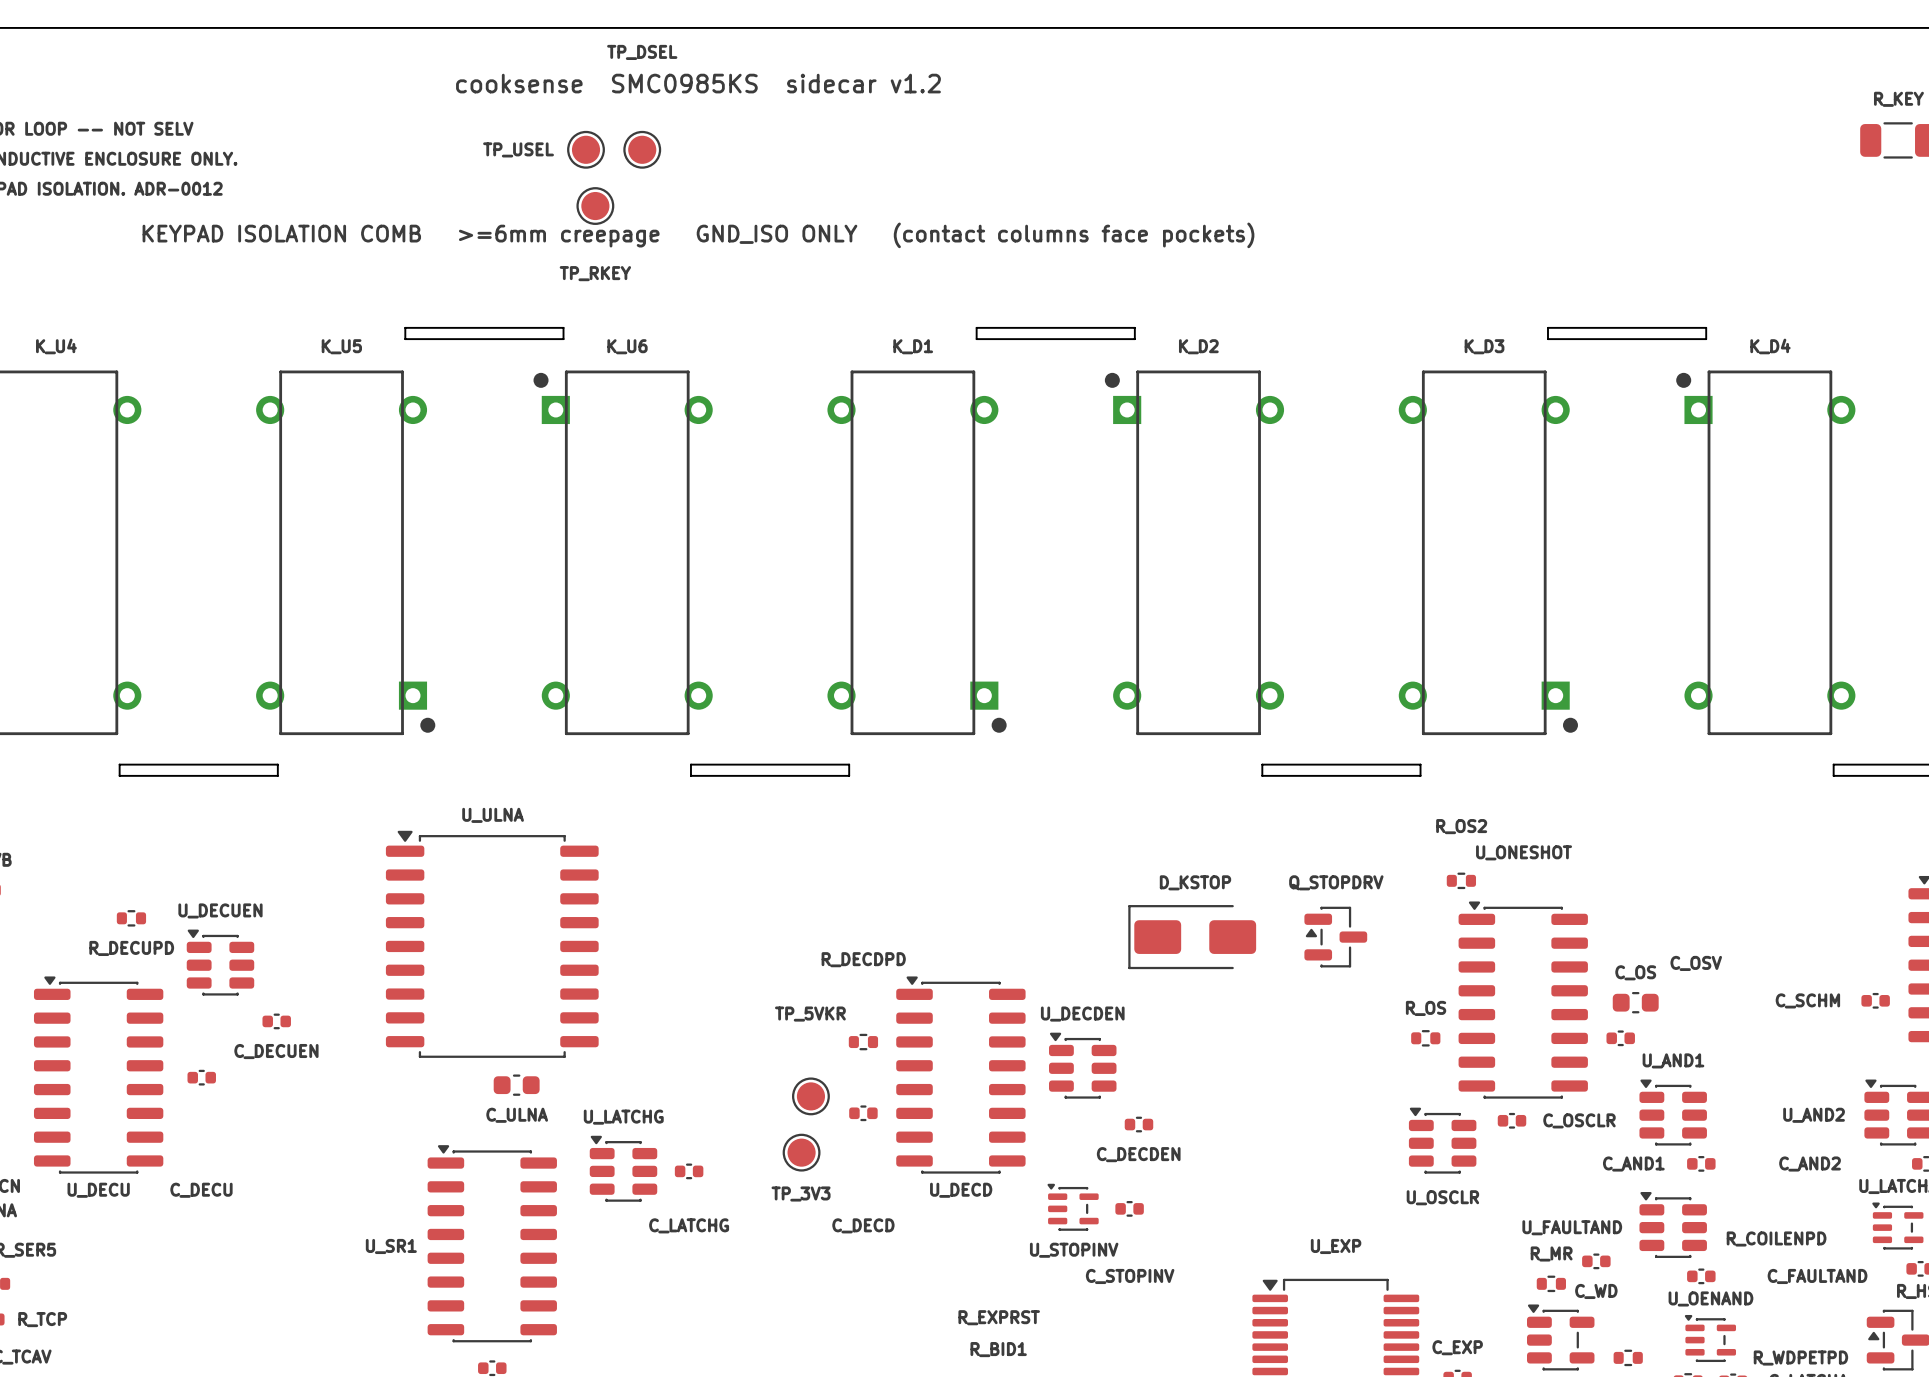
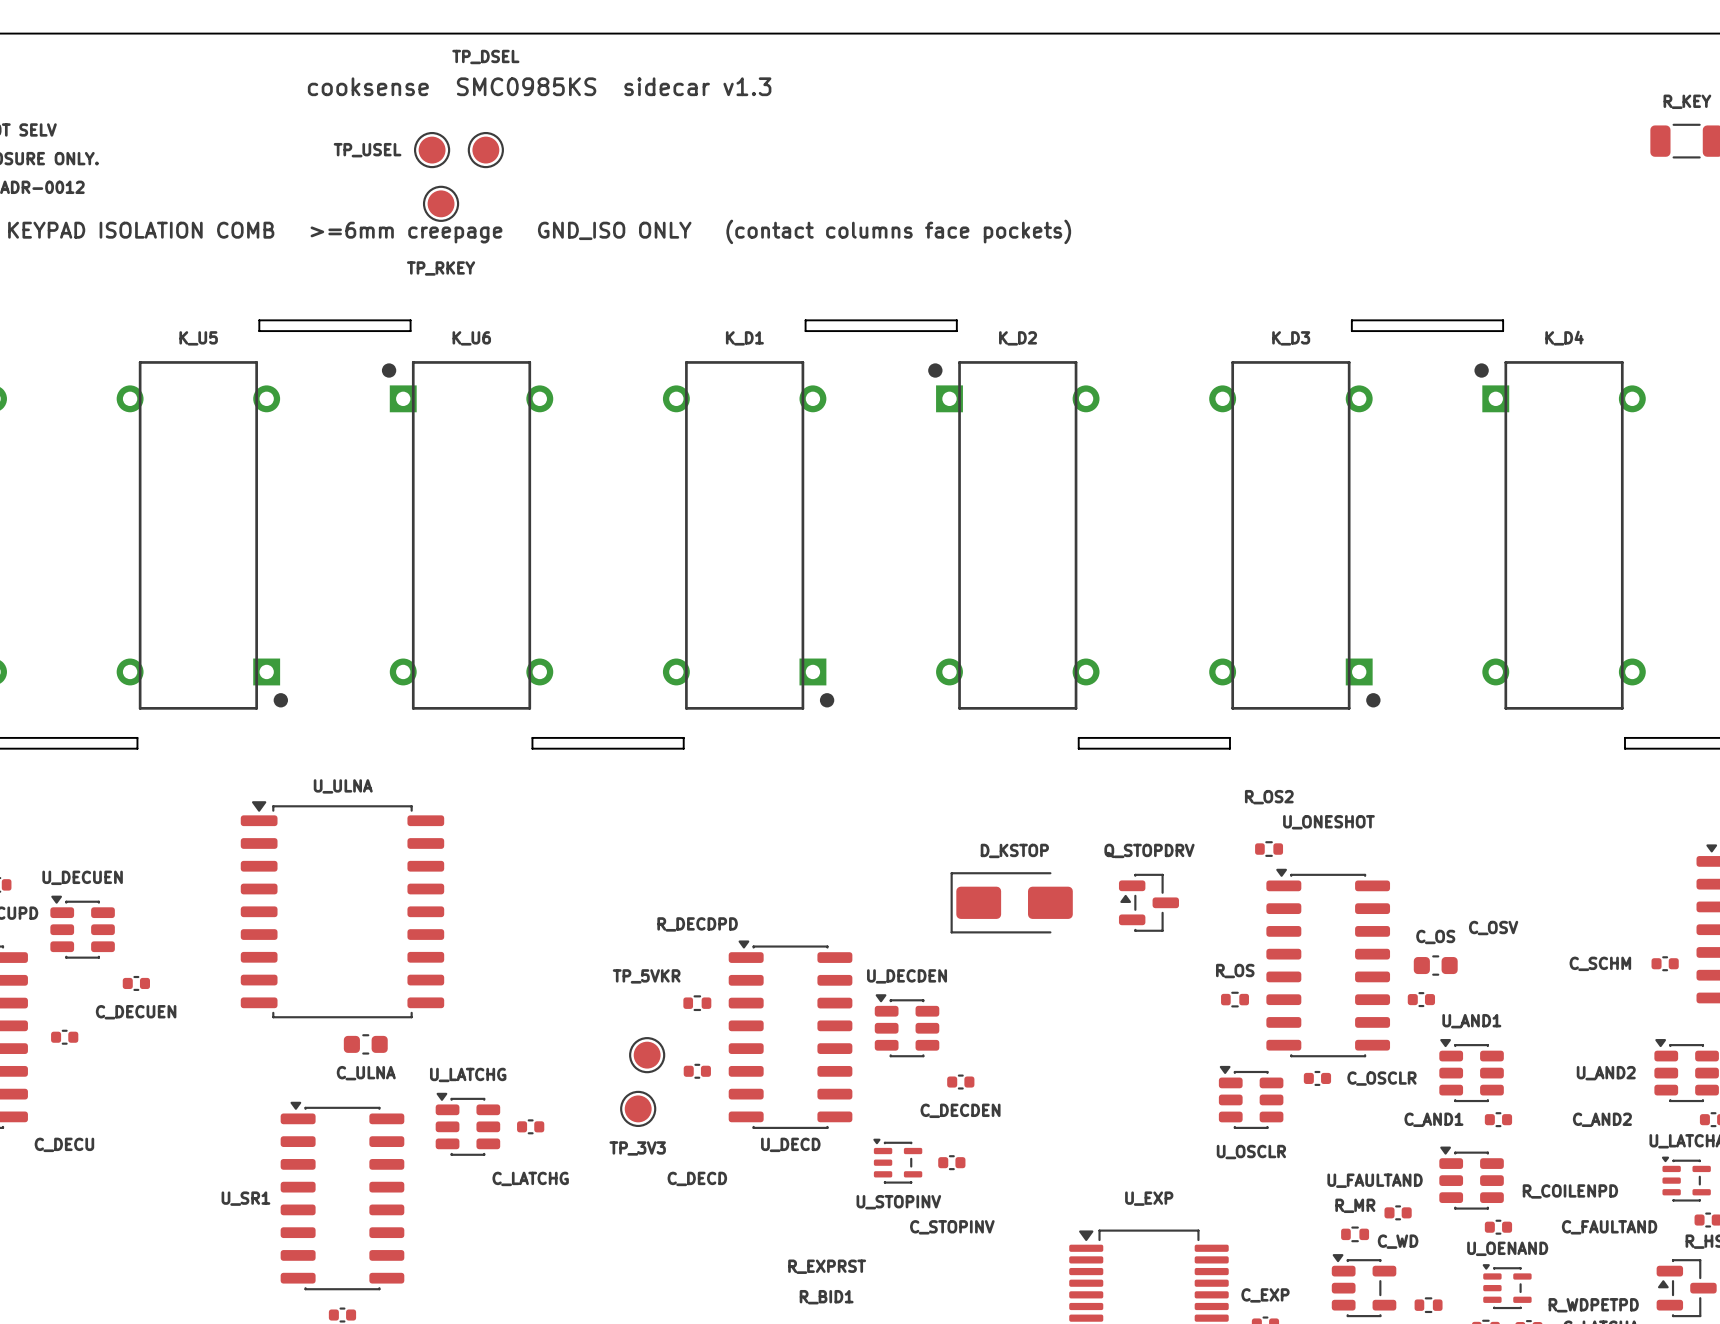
text: cooksense SMC0985KS sidecar v1.2 (698, 83) -> cooksense SMC0985KS sidecar v1.3 (539, 86)

